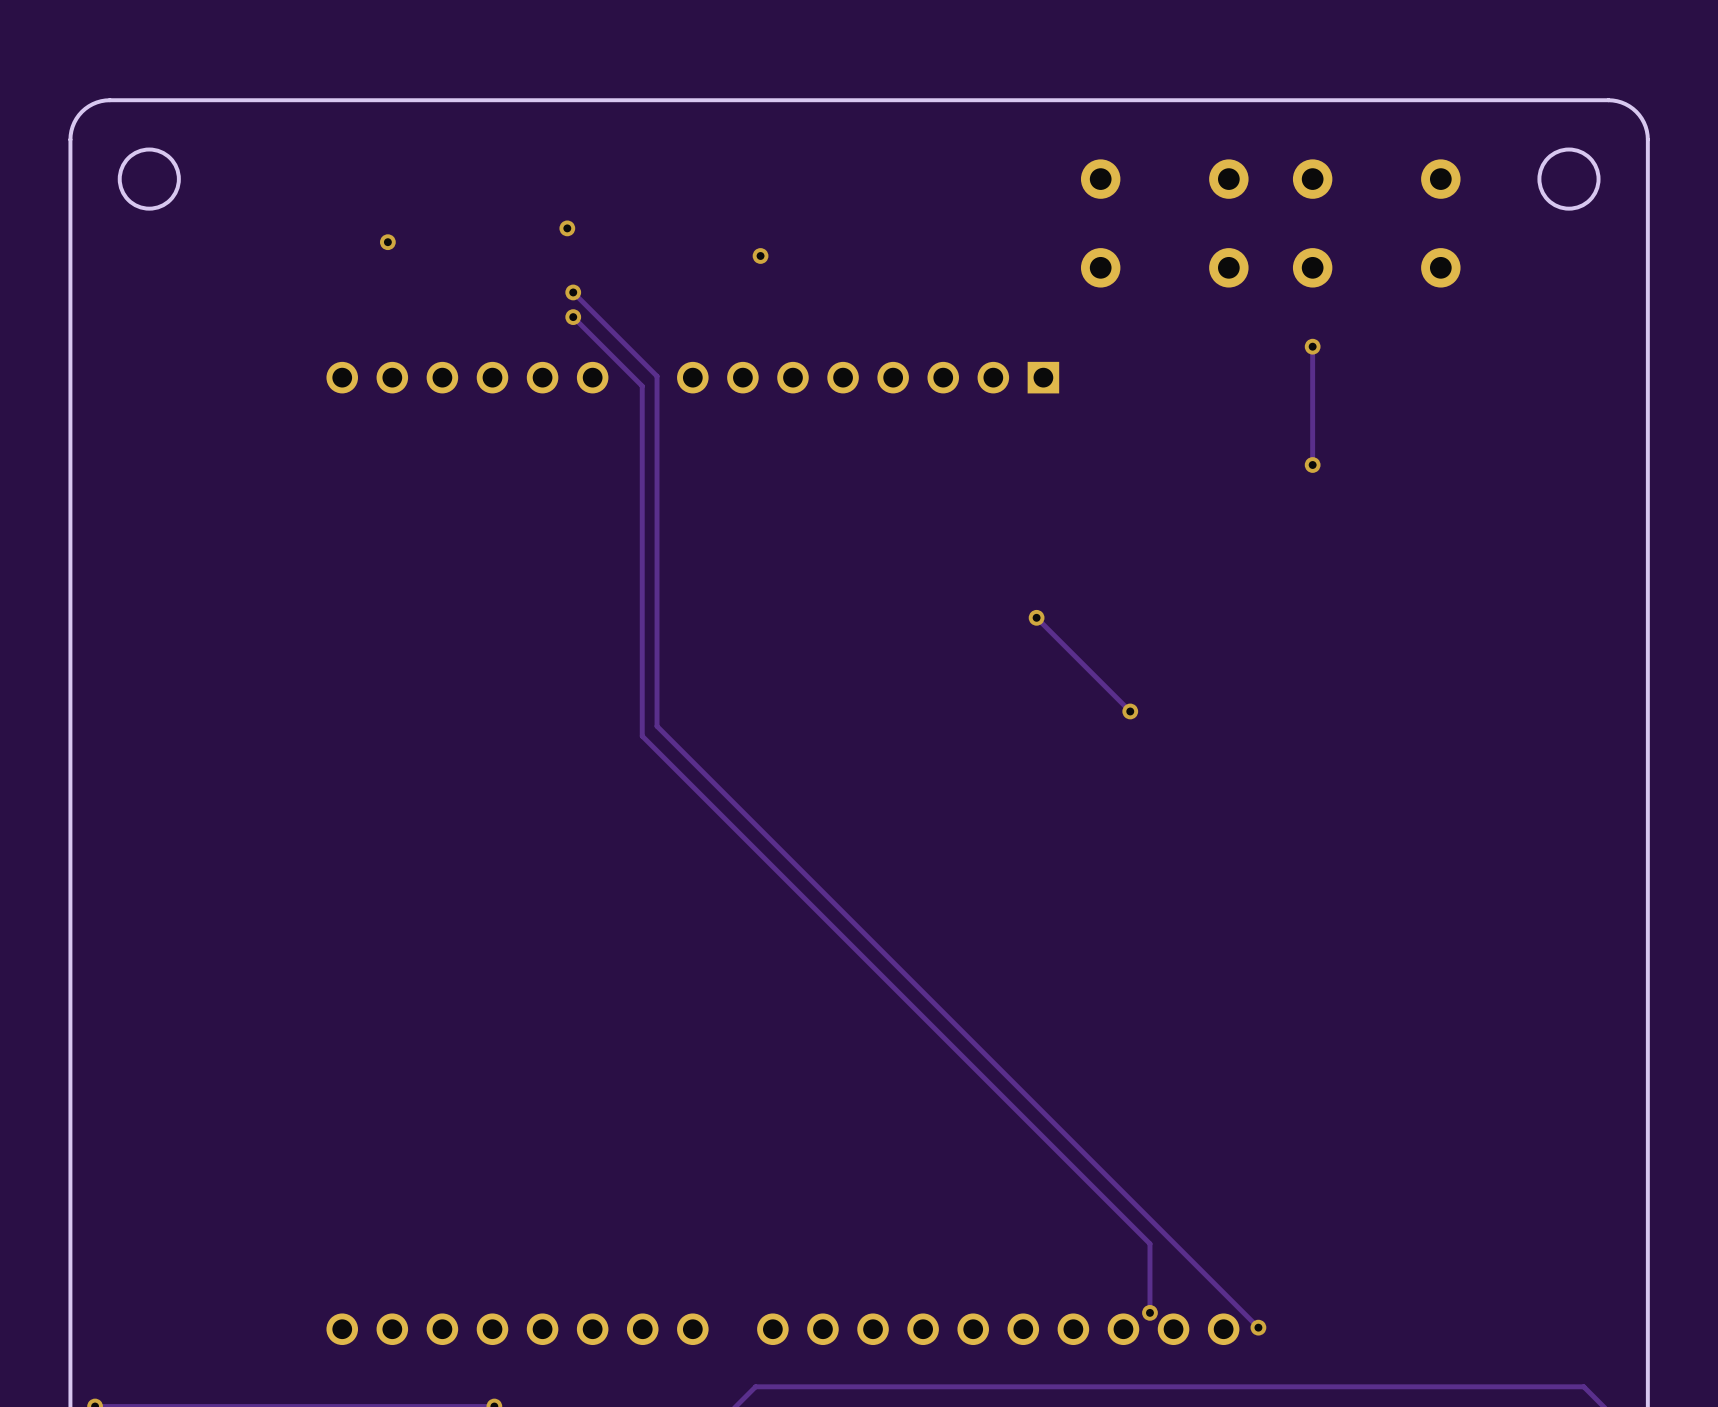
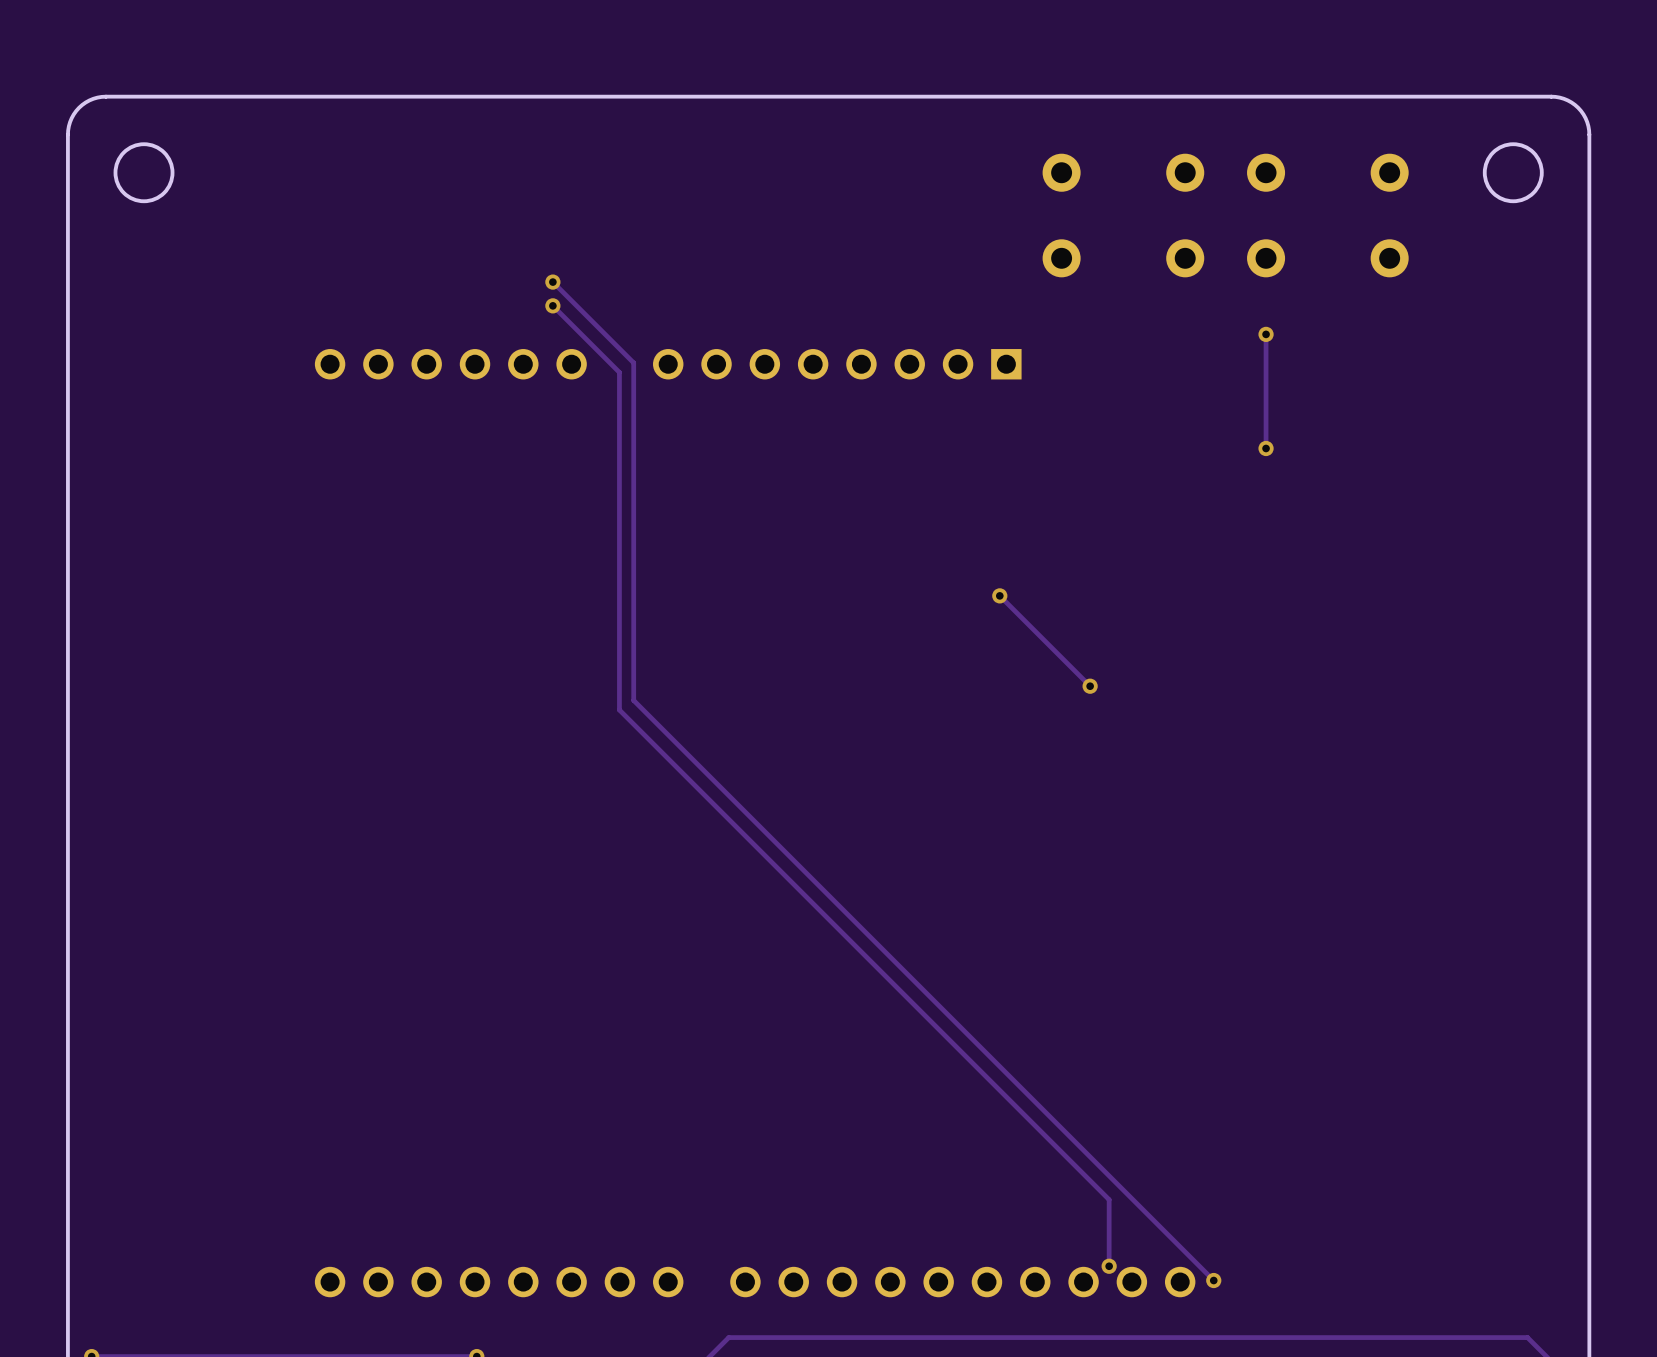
via: (567, 228) -> none
via: (387, 242) -> none
via: (760, 255) -> none

